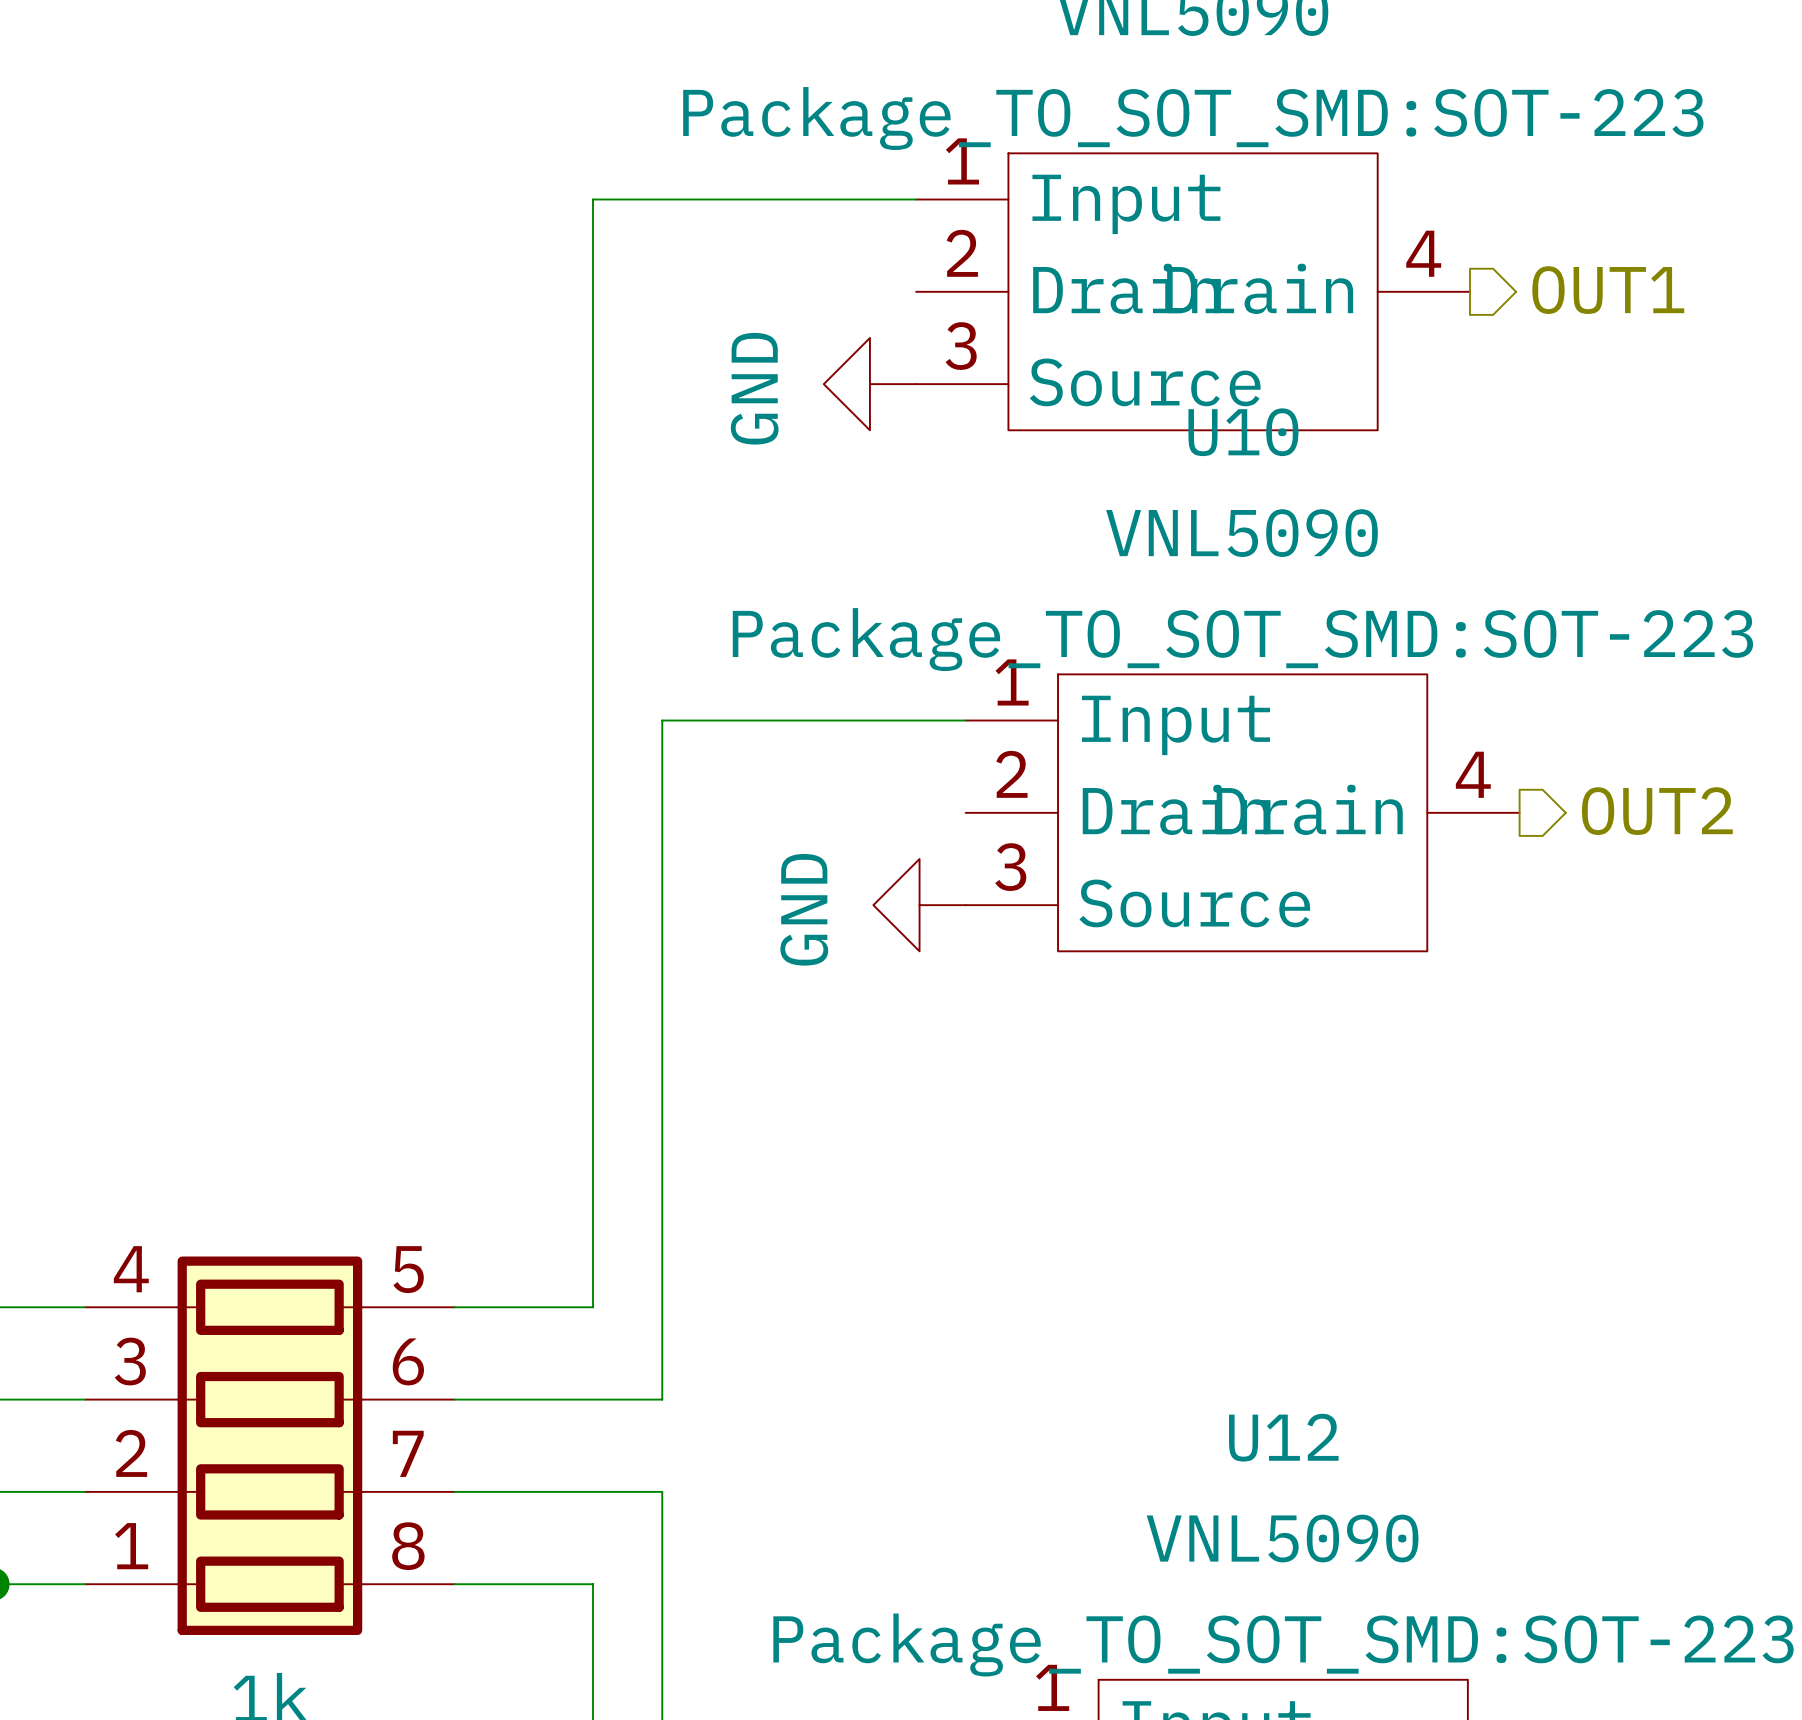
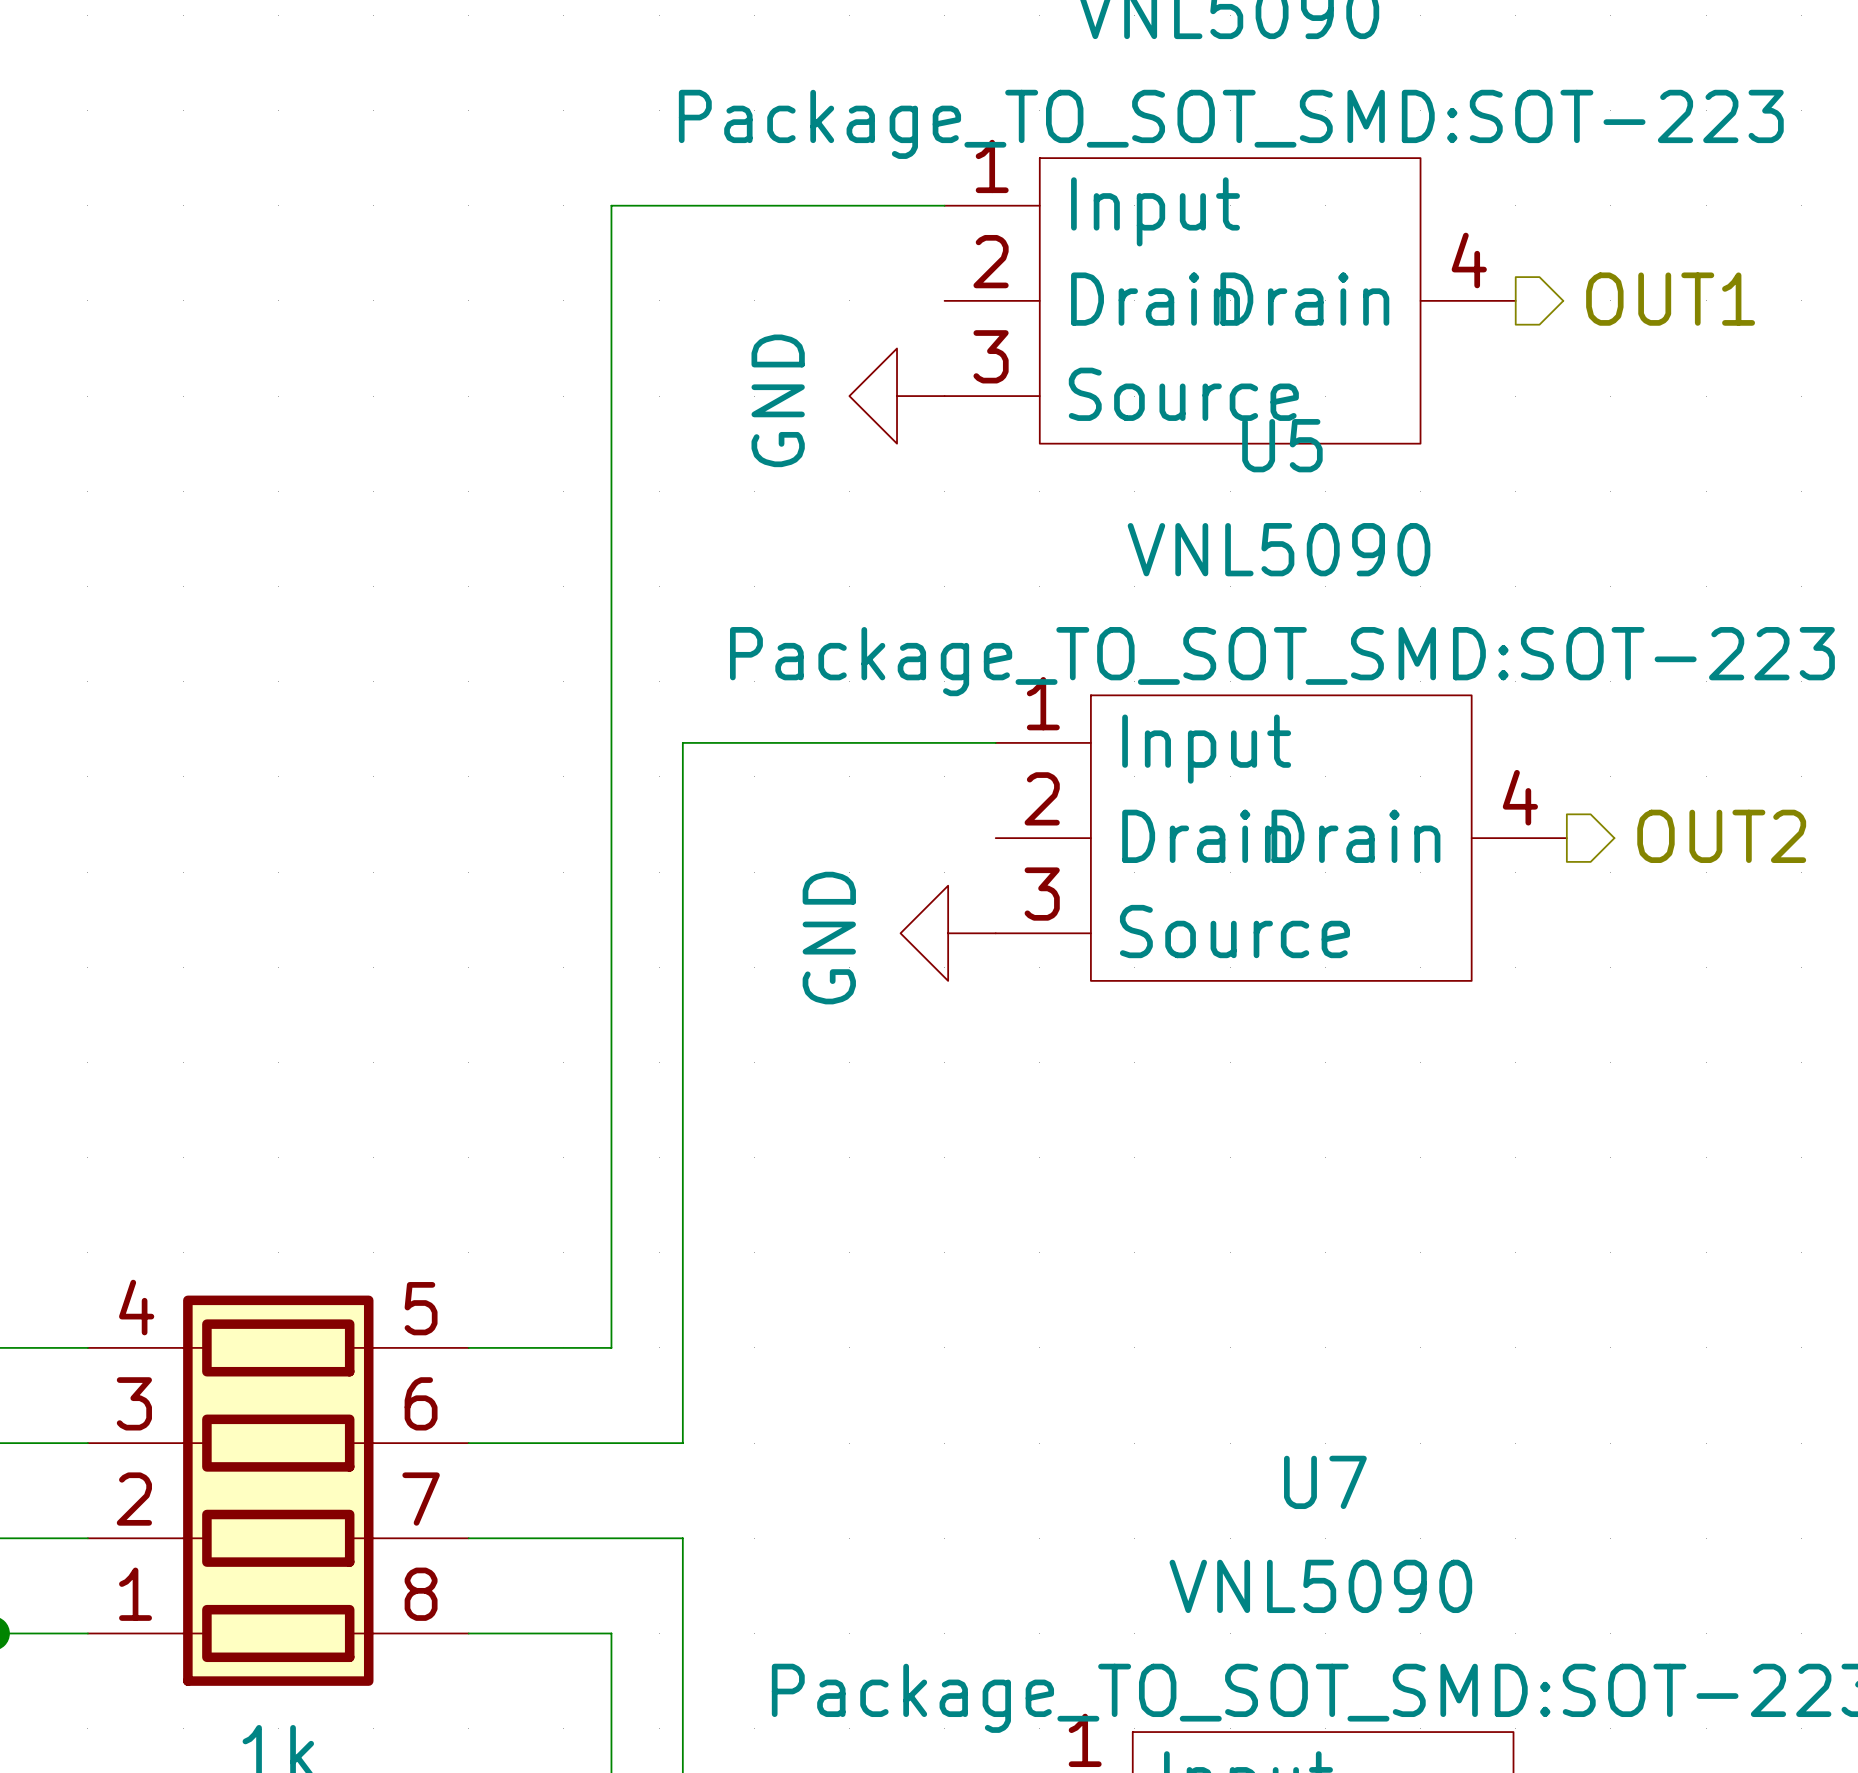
U10 name: U10 (1243, 432) -> U5 (1282, 445)
U12 name: U12 (1283, 1437) -> U7 (1325, 1482)

